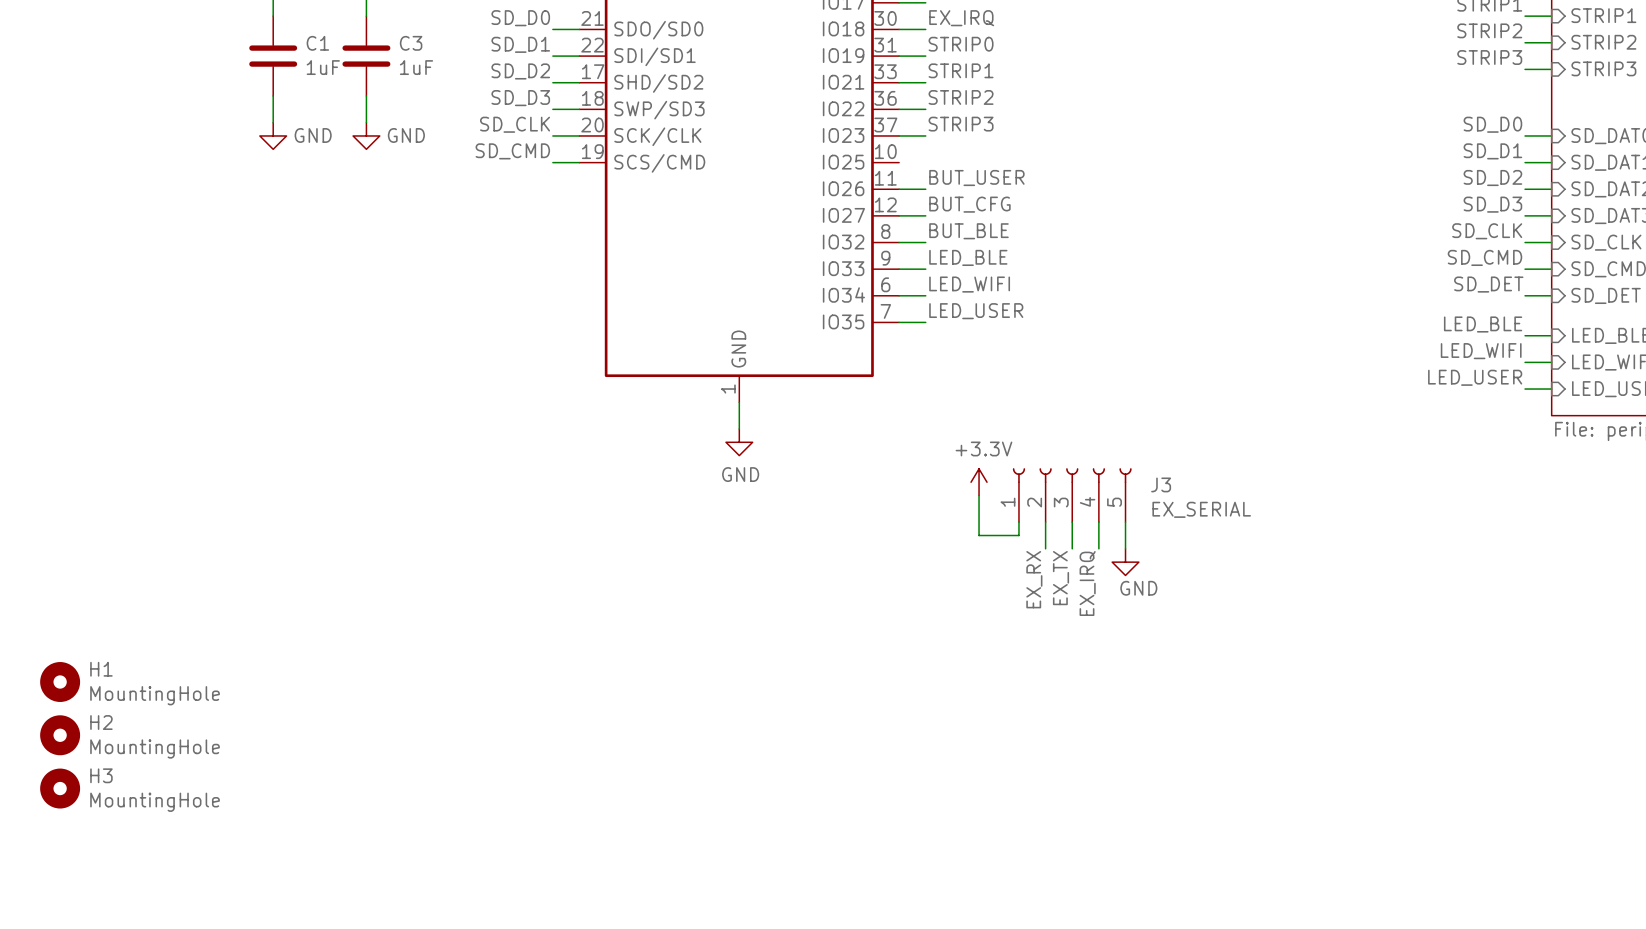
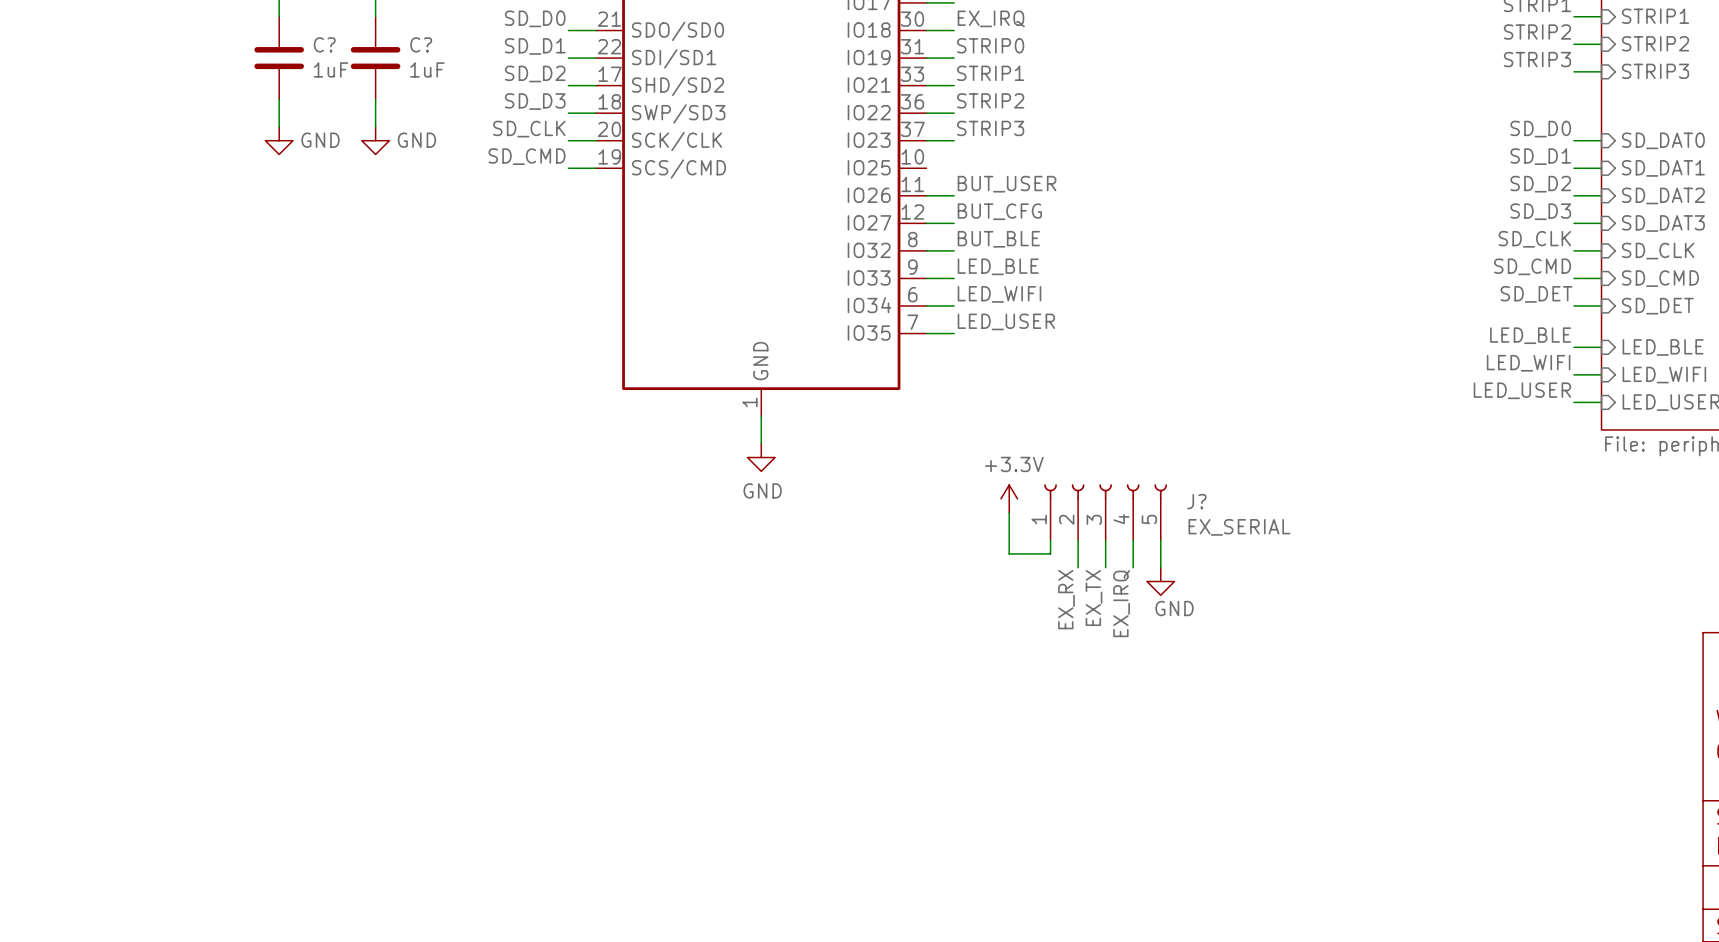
C1 name: C1 (317, 43) -> C? (324, 44)
C3 name: C3 (411, 43) -> C? (421, 44)
J3 name: J3 (1161, 484) -> J? (1196, 501)
H1: MountingHole (60, 682) -> none
H2: MountingHole (60, 735) -> none
H3: MountingHole (60, 788) -> none

